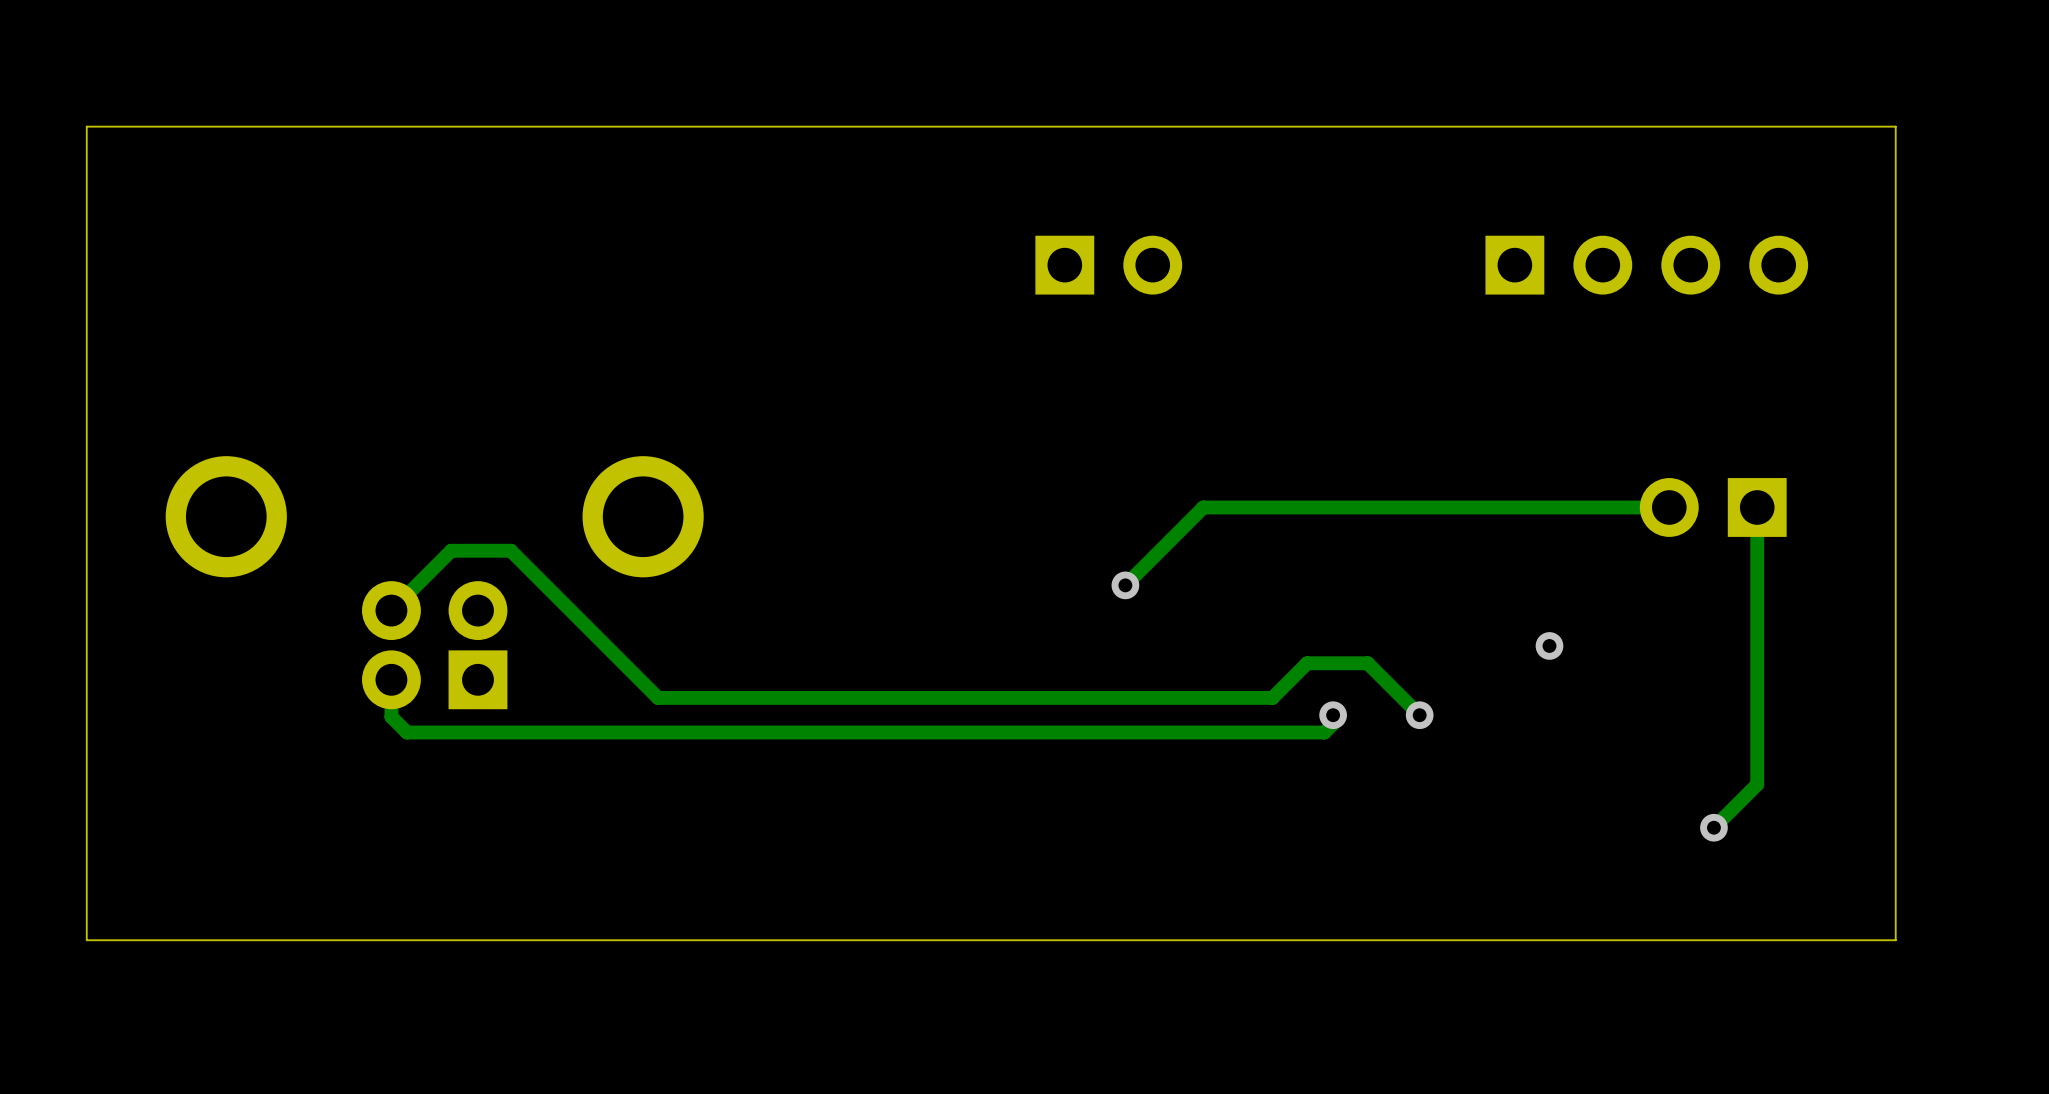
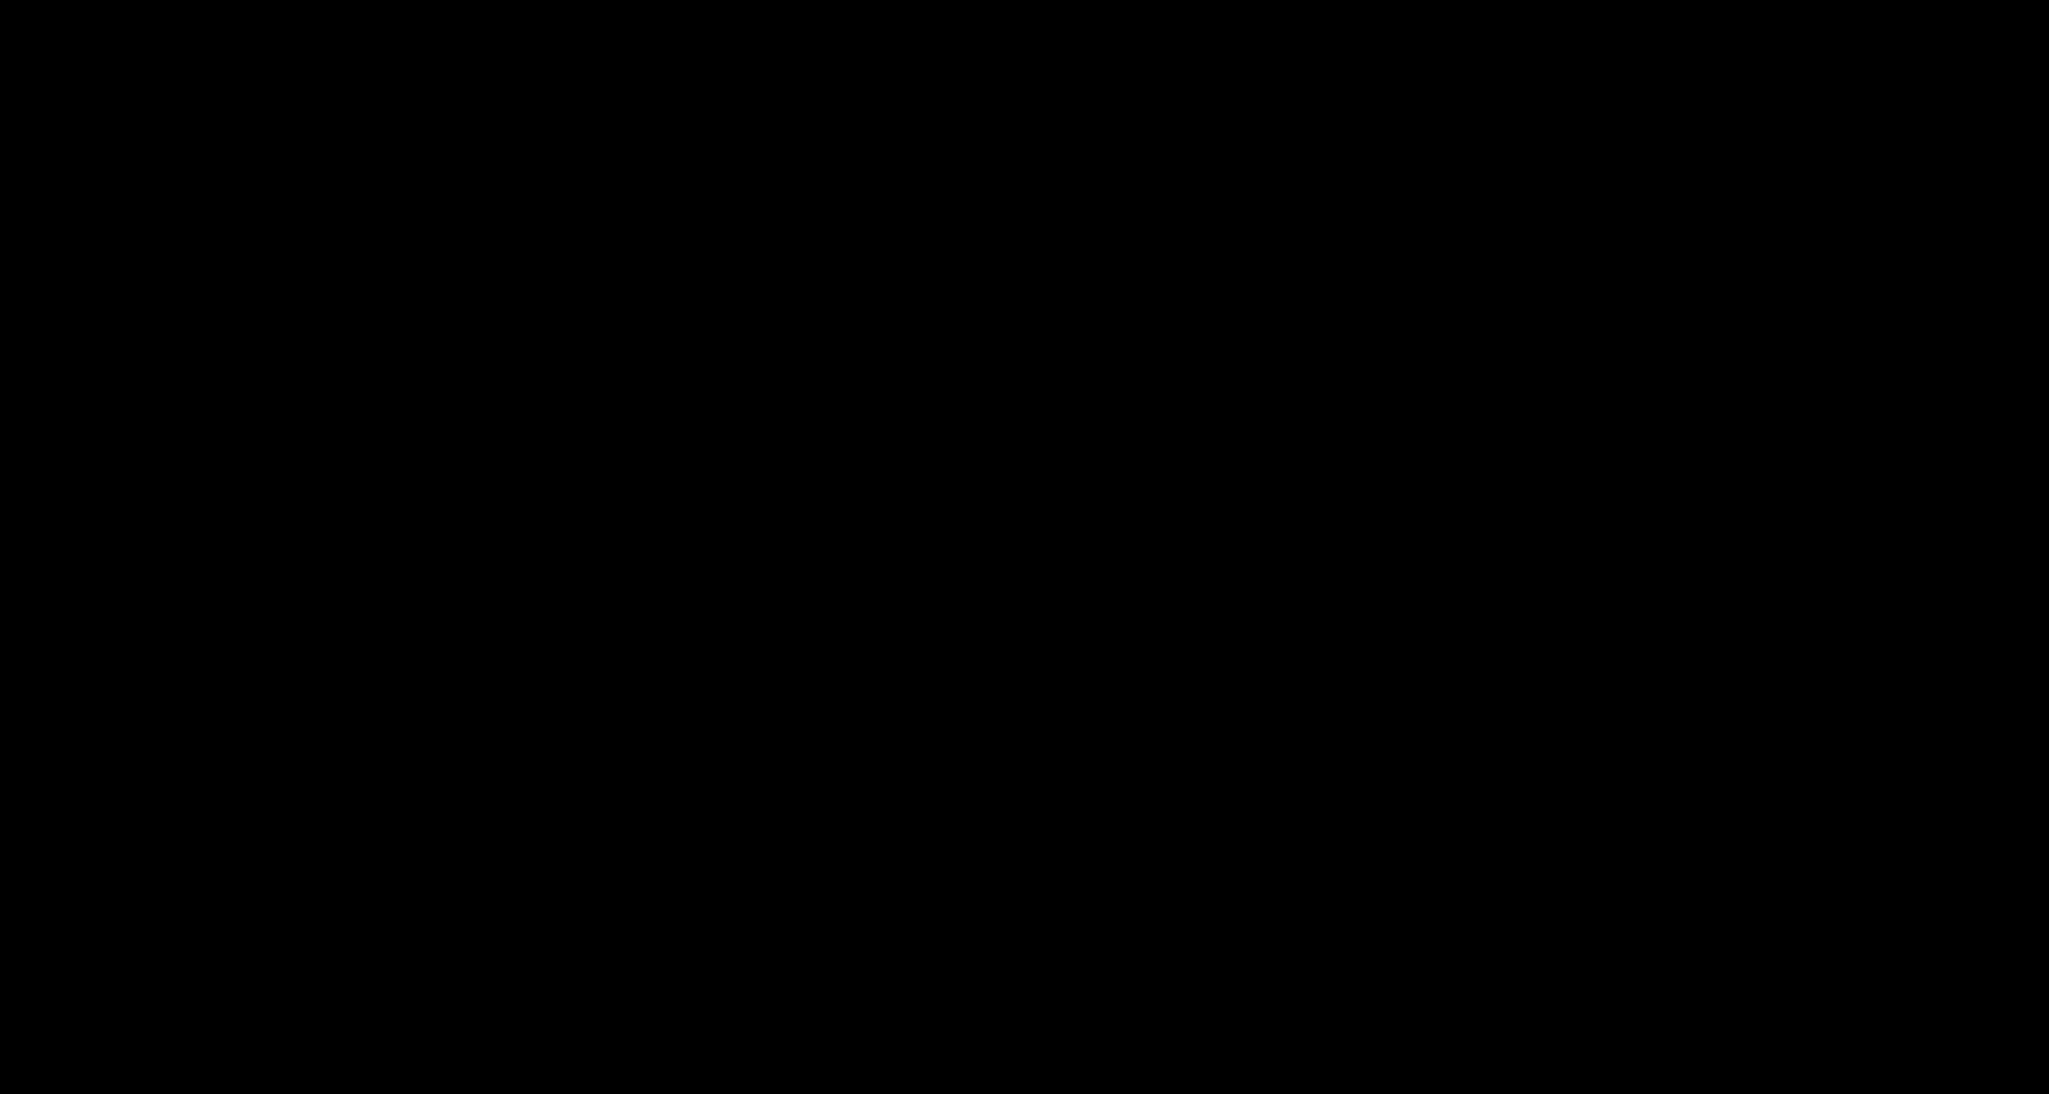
board edge: (1895, 126) (1895, 940) (86, 940) (86, 126) (1895, 126) -> none
part: (1108, 265) -> none
part: (1646, 265) -> none
track: (1669, 507) (1203, 507) (1125, 585) -> none
part: (1713, 507) -> none
track: (1757, 507) (1757, 784) (1713, 827) -> none
part: (434, 582) -> none
via: (1125, 585) -> none
track: (391, 610) (451, 550) (510, 550) (658, 697) (1272, 697) (1307, 663) (1367, 663) (1419, 715) -> none
via: (1549, 645) -> none
track: (391, 679) (391, 716) (407, 732) (1324, 732) (1333, 723) (1333, 715) -> none
via: (1333, 715) -> none
via: (1419, 715) -> none
via: (1713, 827) -> none

